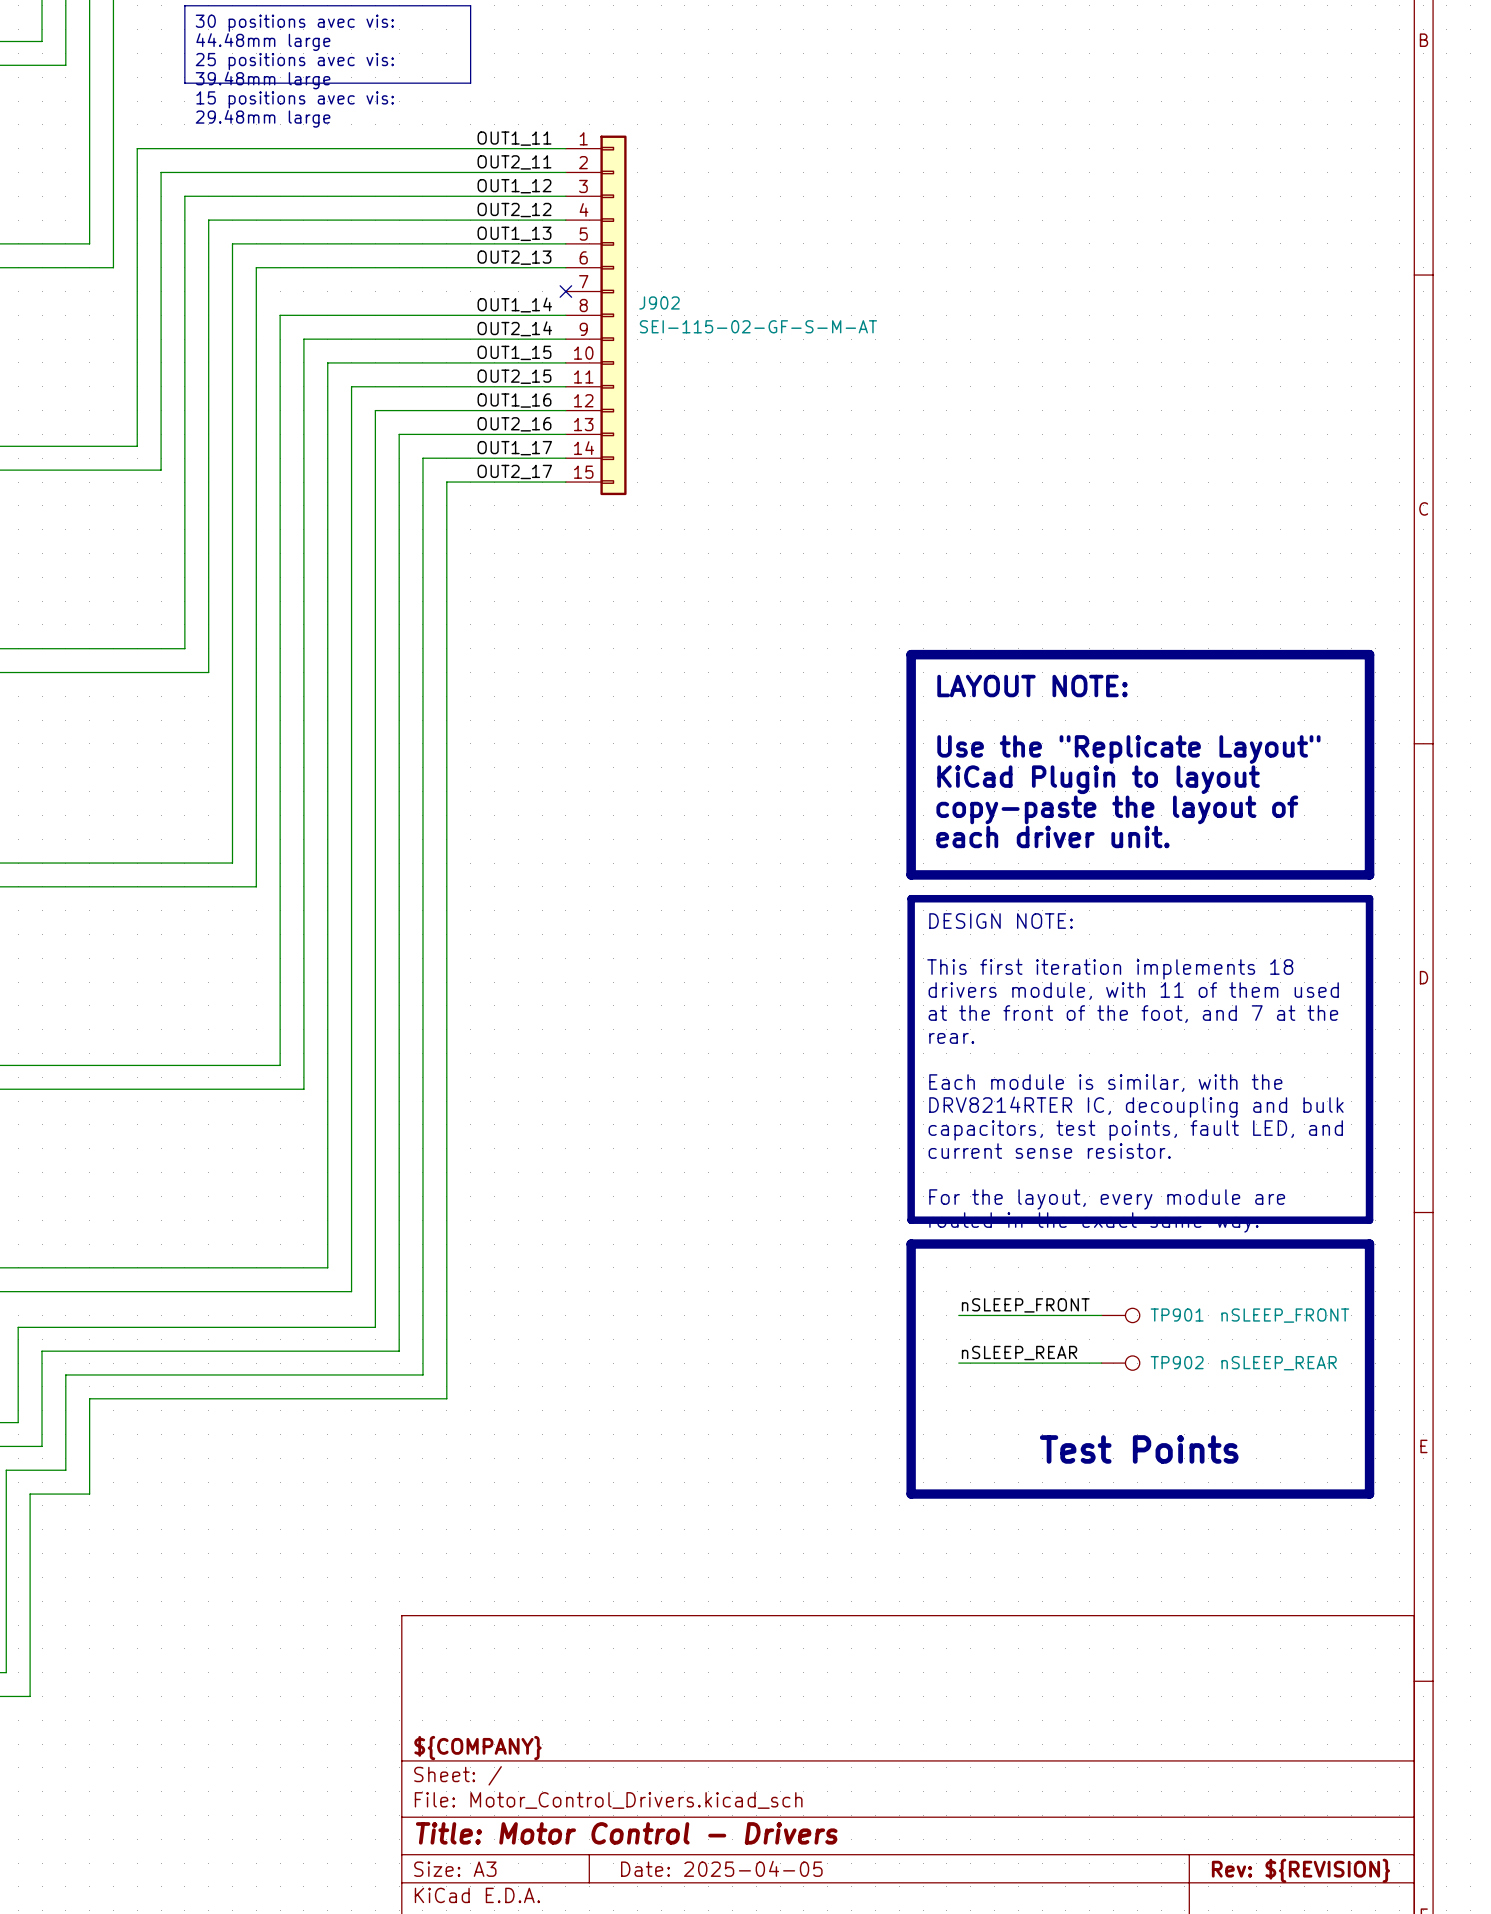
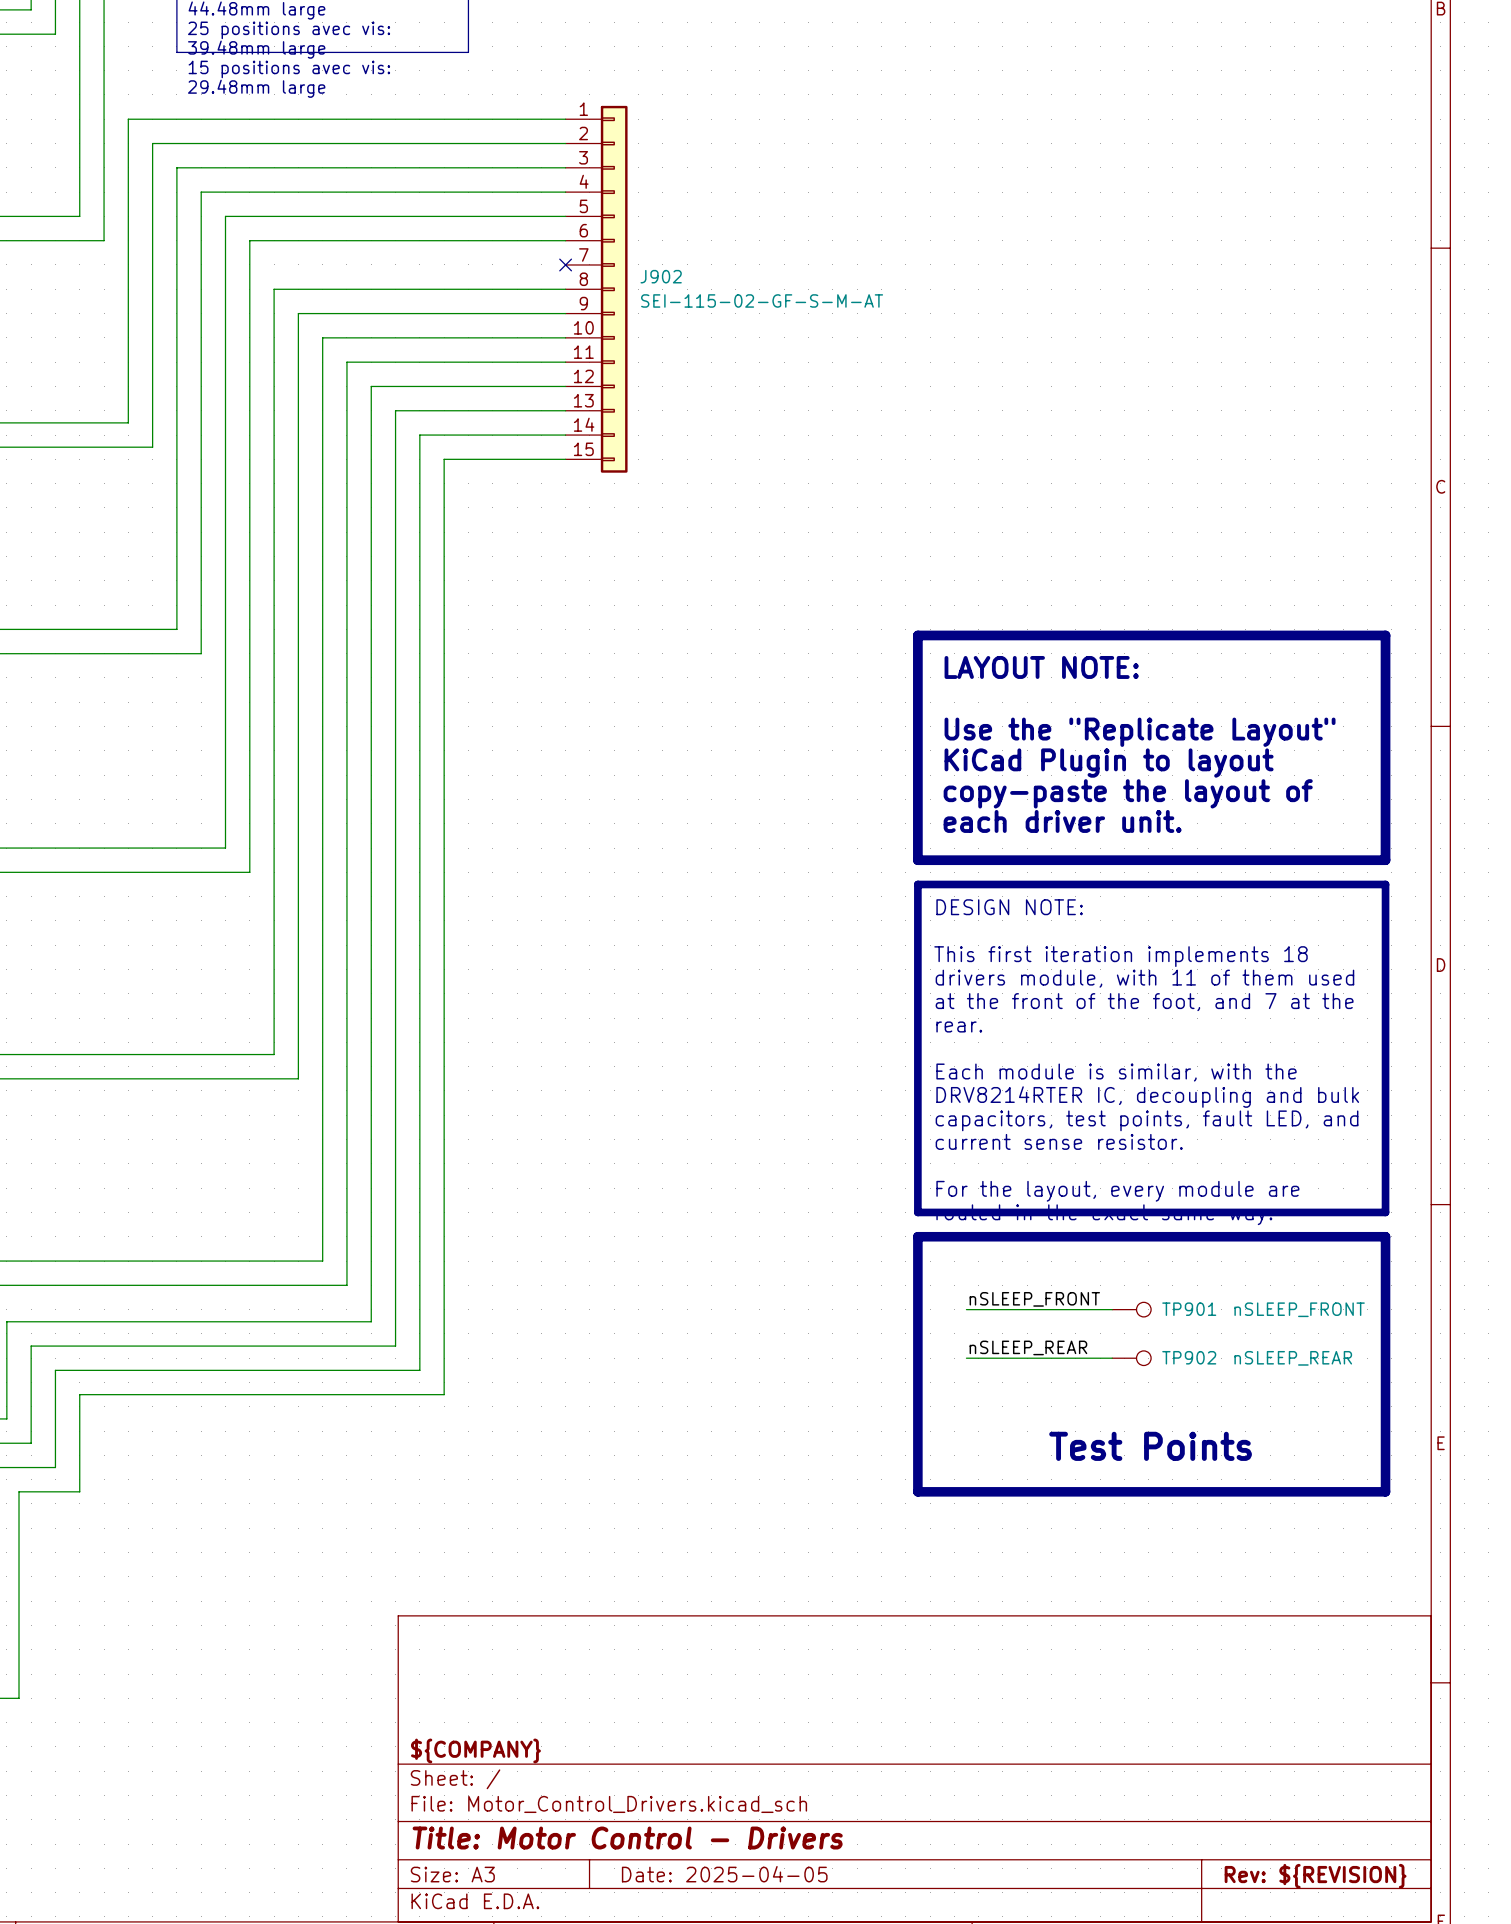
label: OUT1_11 (514, 138) -> none
label: OUT2_11 (514, 162) -> none
label: OUT1_12 (514, 186) -> none
label: OUT2_12 (514, 210) -> none
label: OUT1_13 (514, 233) -> none
label: OUT2_13 (514, 257) -> none
label: OUT1_14 (514, 304) -> none
label: OUT2_14 (514, 328) -> none
label: OUT1_15 (514, 352) -> none
label: OUT2_15 (514, 376) -> none
label: OUT1_16 (514, 400) -> none
label: OUT2_16 (514, 424) -> none
label: OUT1_17 (514, 448) -> none
label: OUT2_17 (514, 471) -> none

